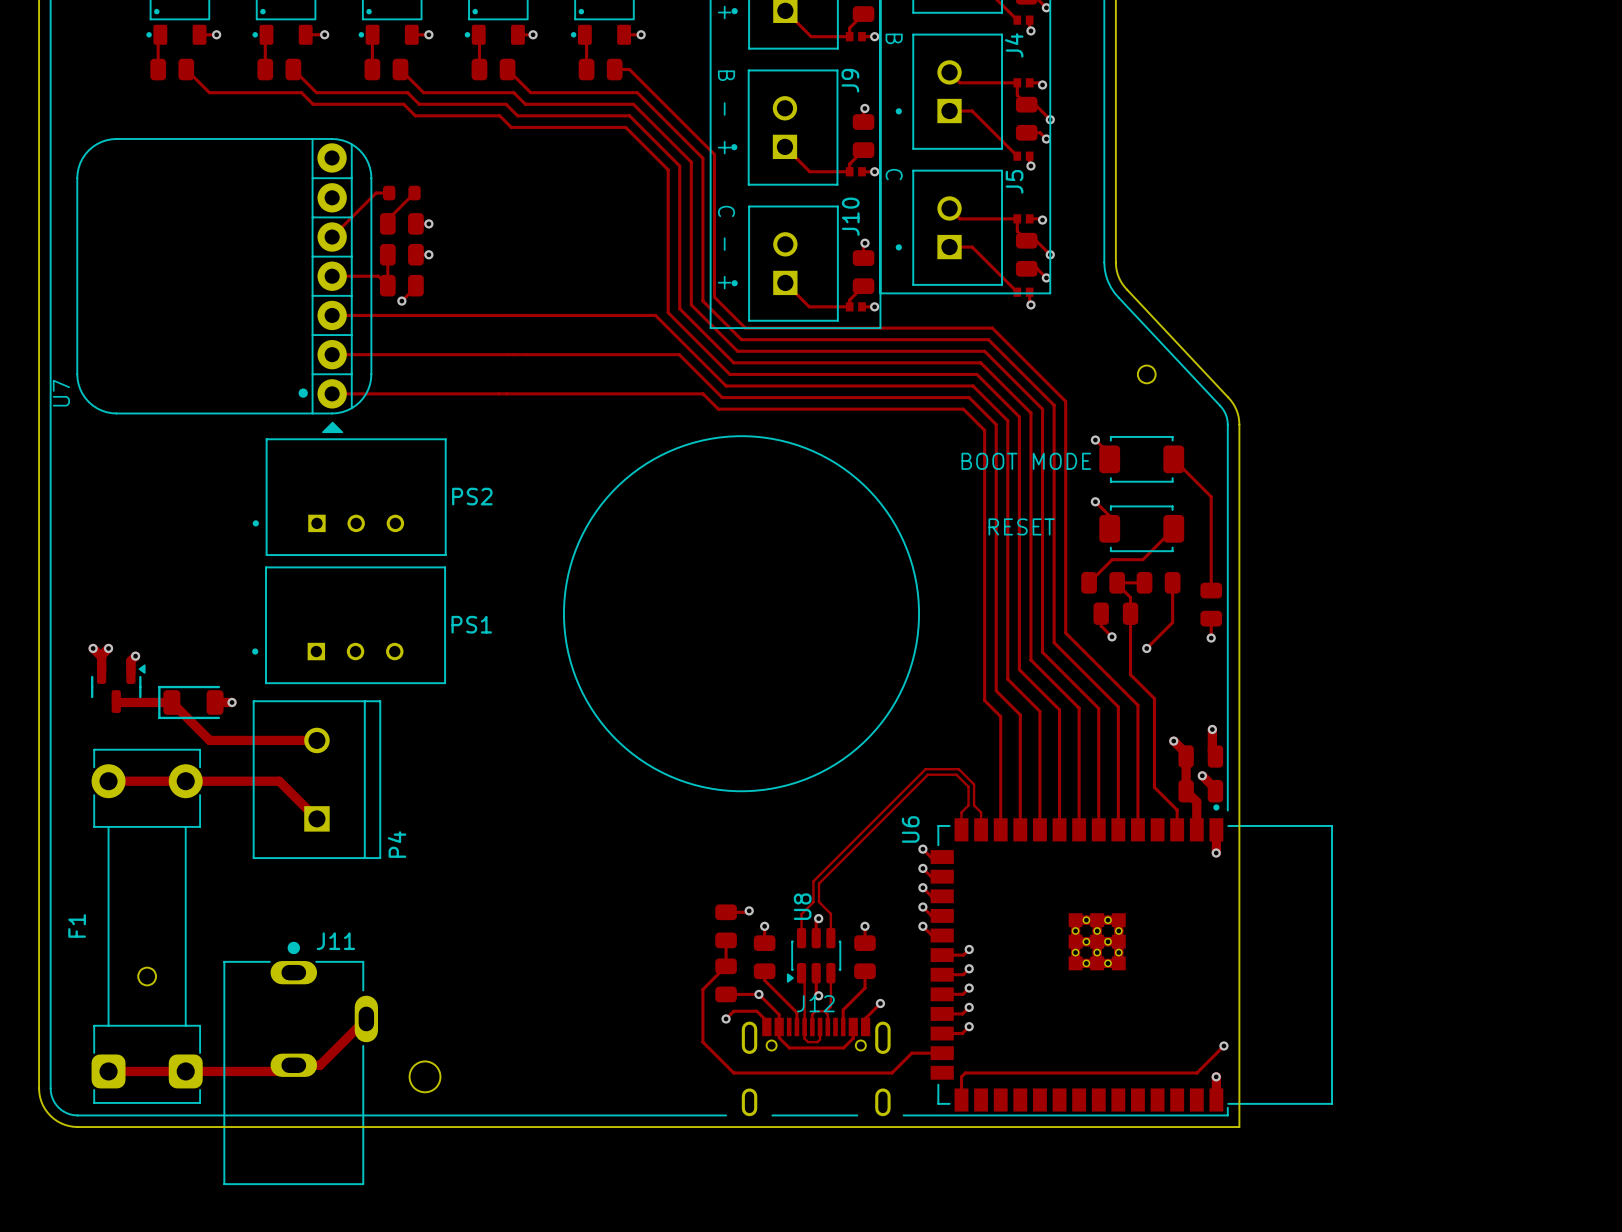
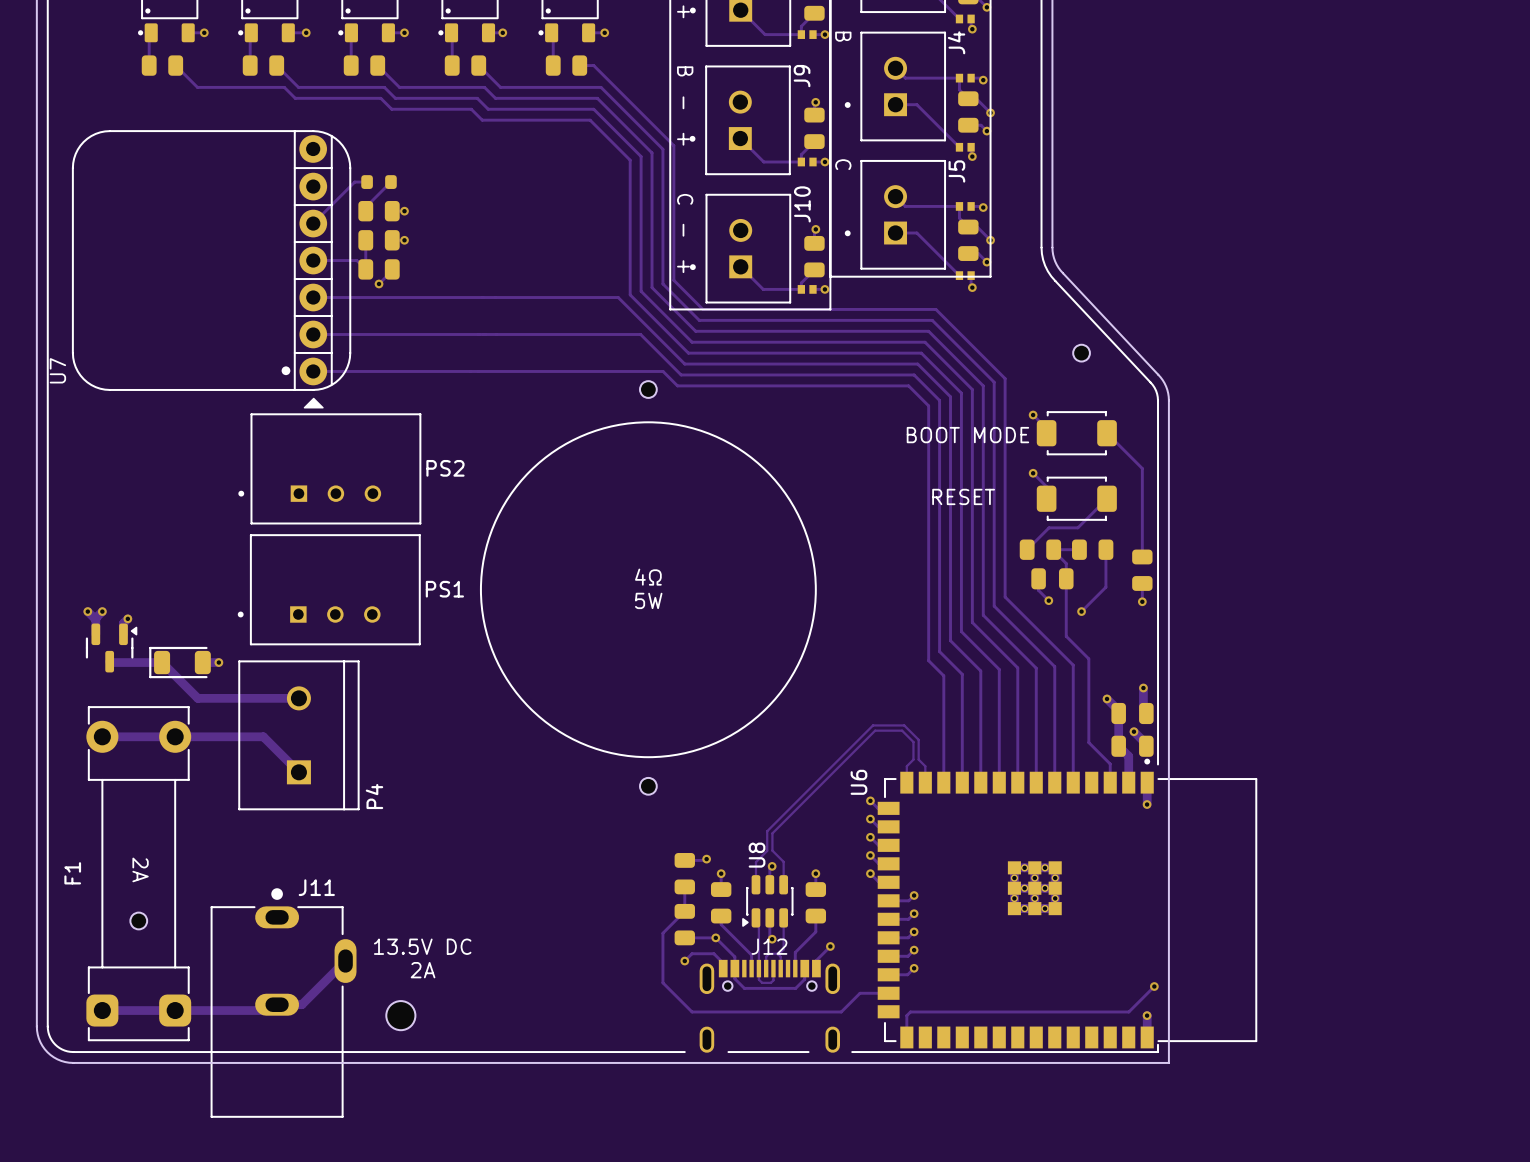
part: none -> (648, 389)
text: none -> 4Ω (648, 577)
drawing position: (741, 613) -> (648, 589)
text: none -> 5W (648, 600)
part: none -> (648, 786)
text: none -> 2A (140, 869)
text: none -> 13.5V DC (422, 946)
text: none -> 2A (423, 970)

